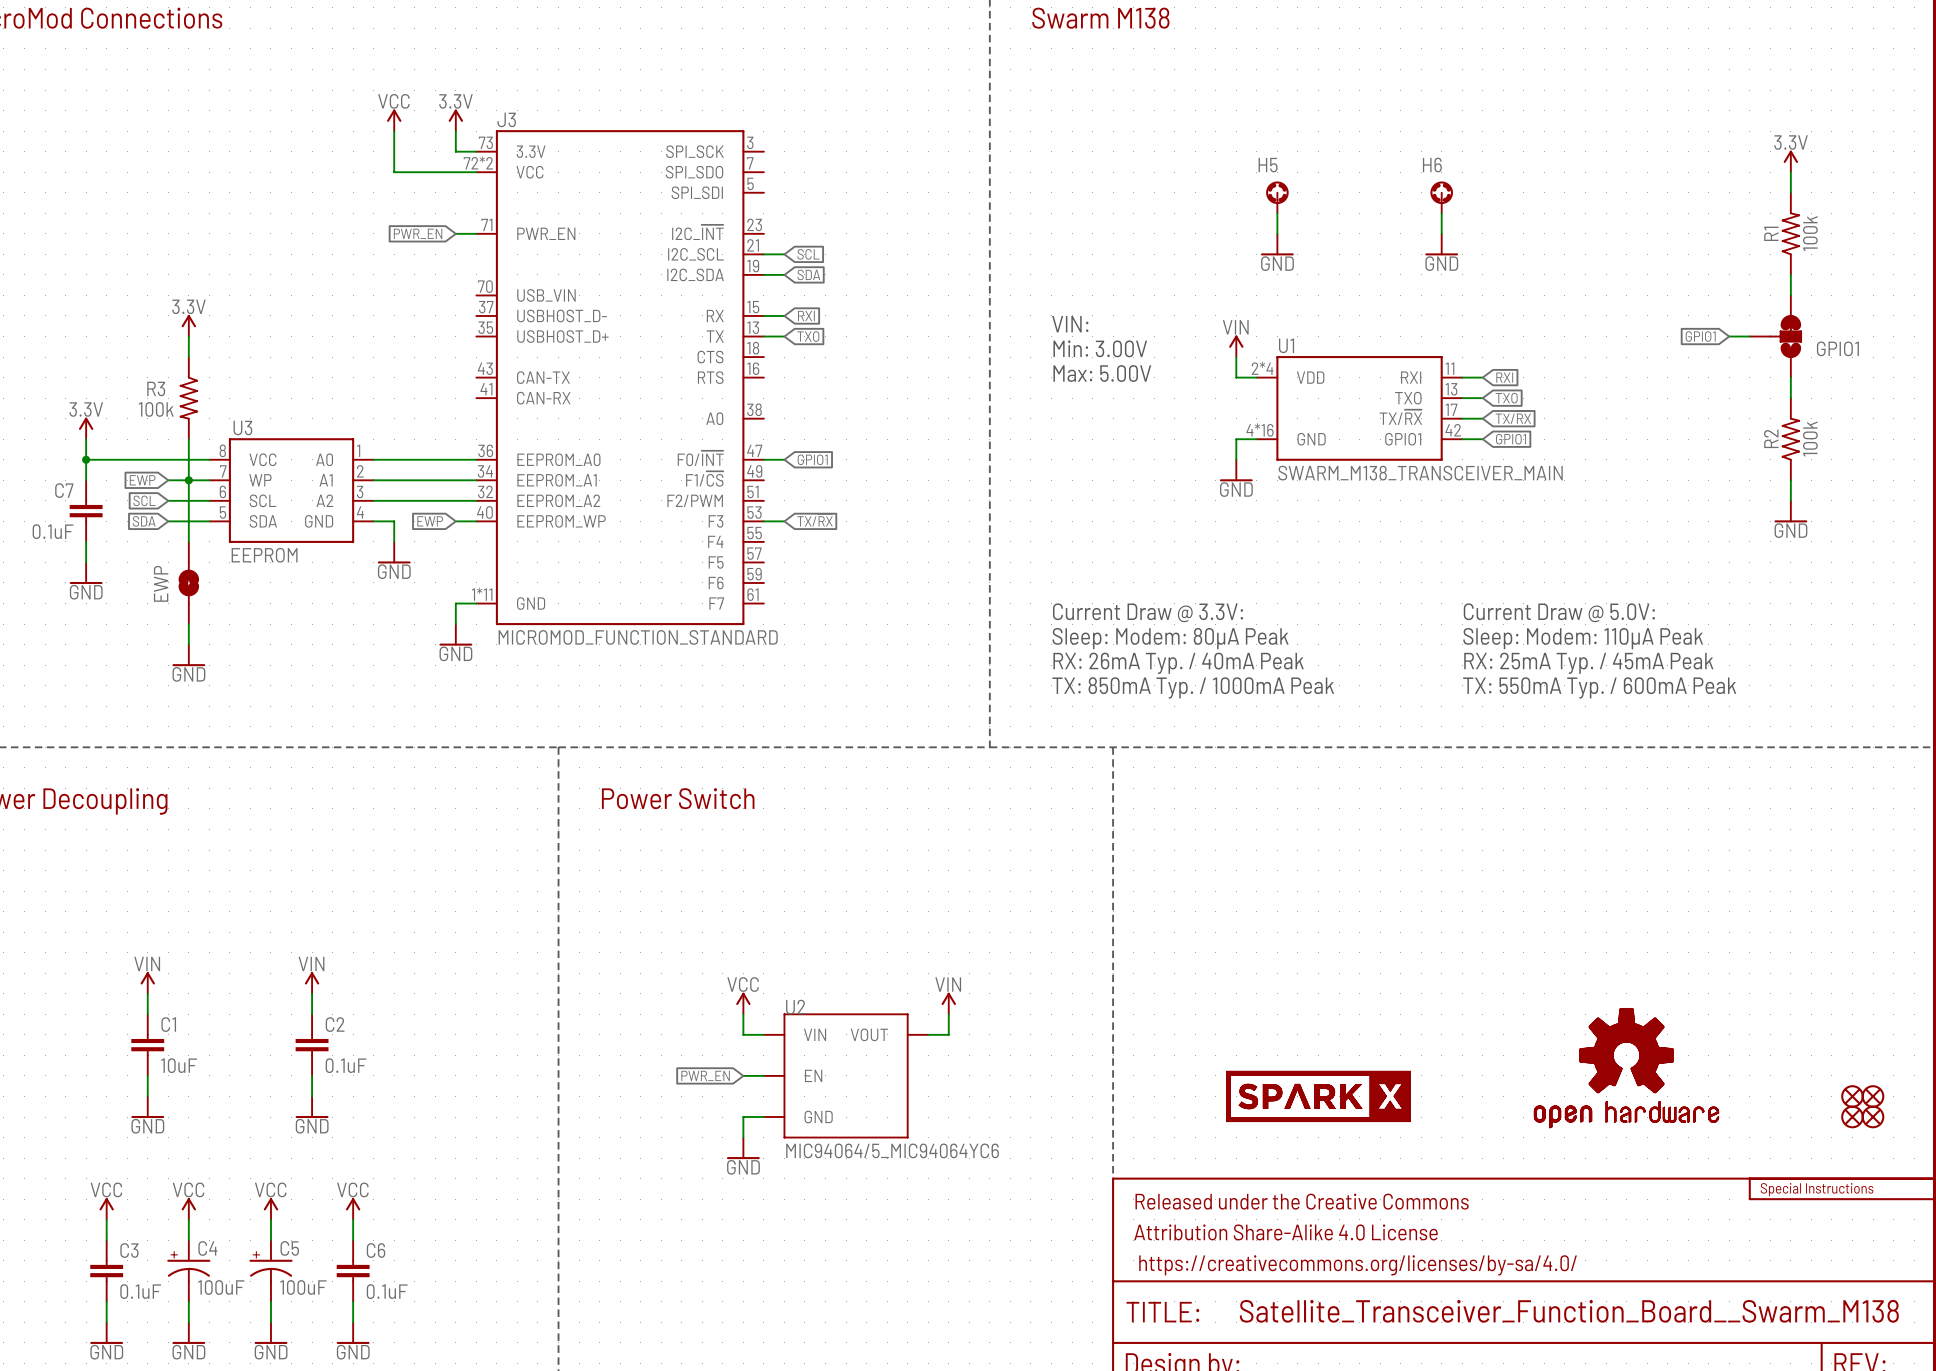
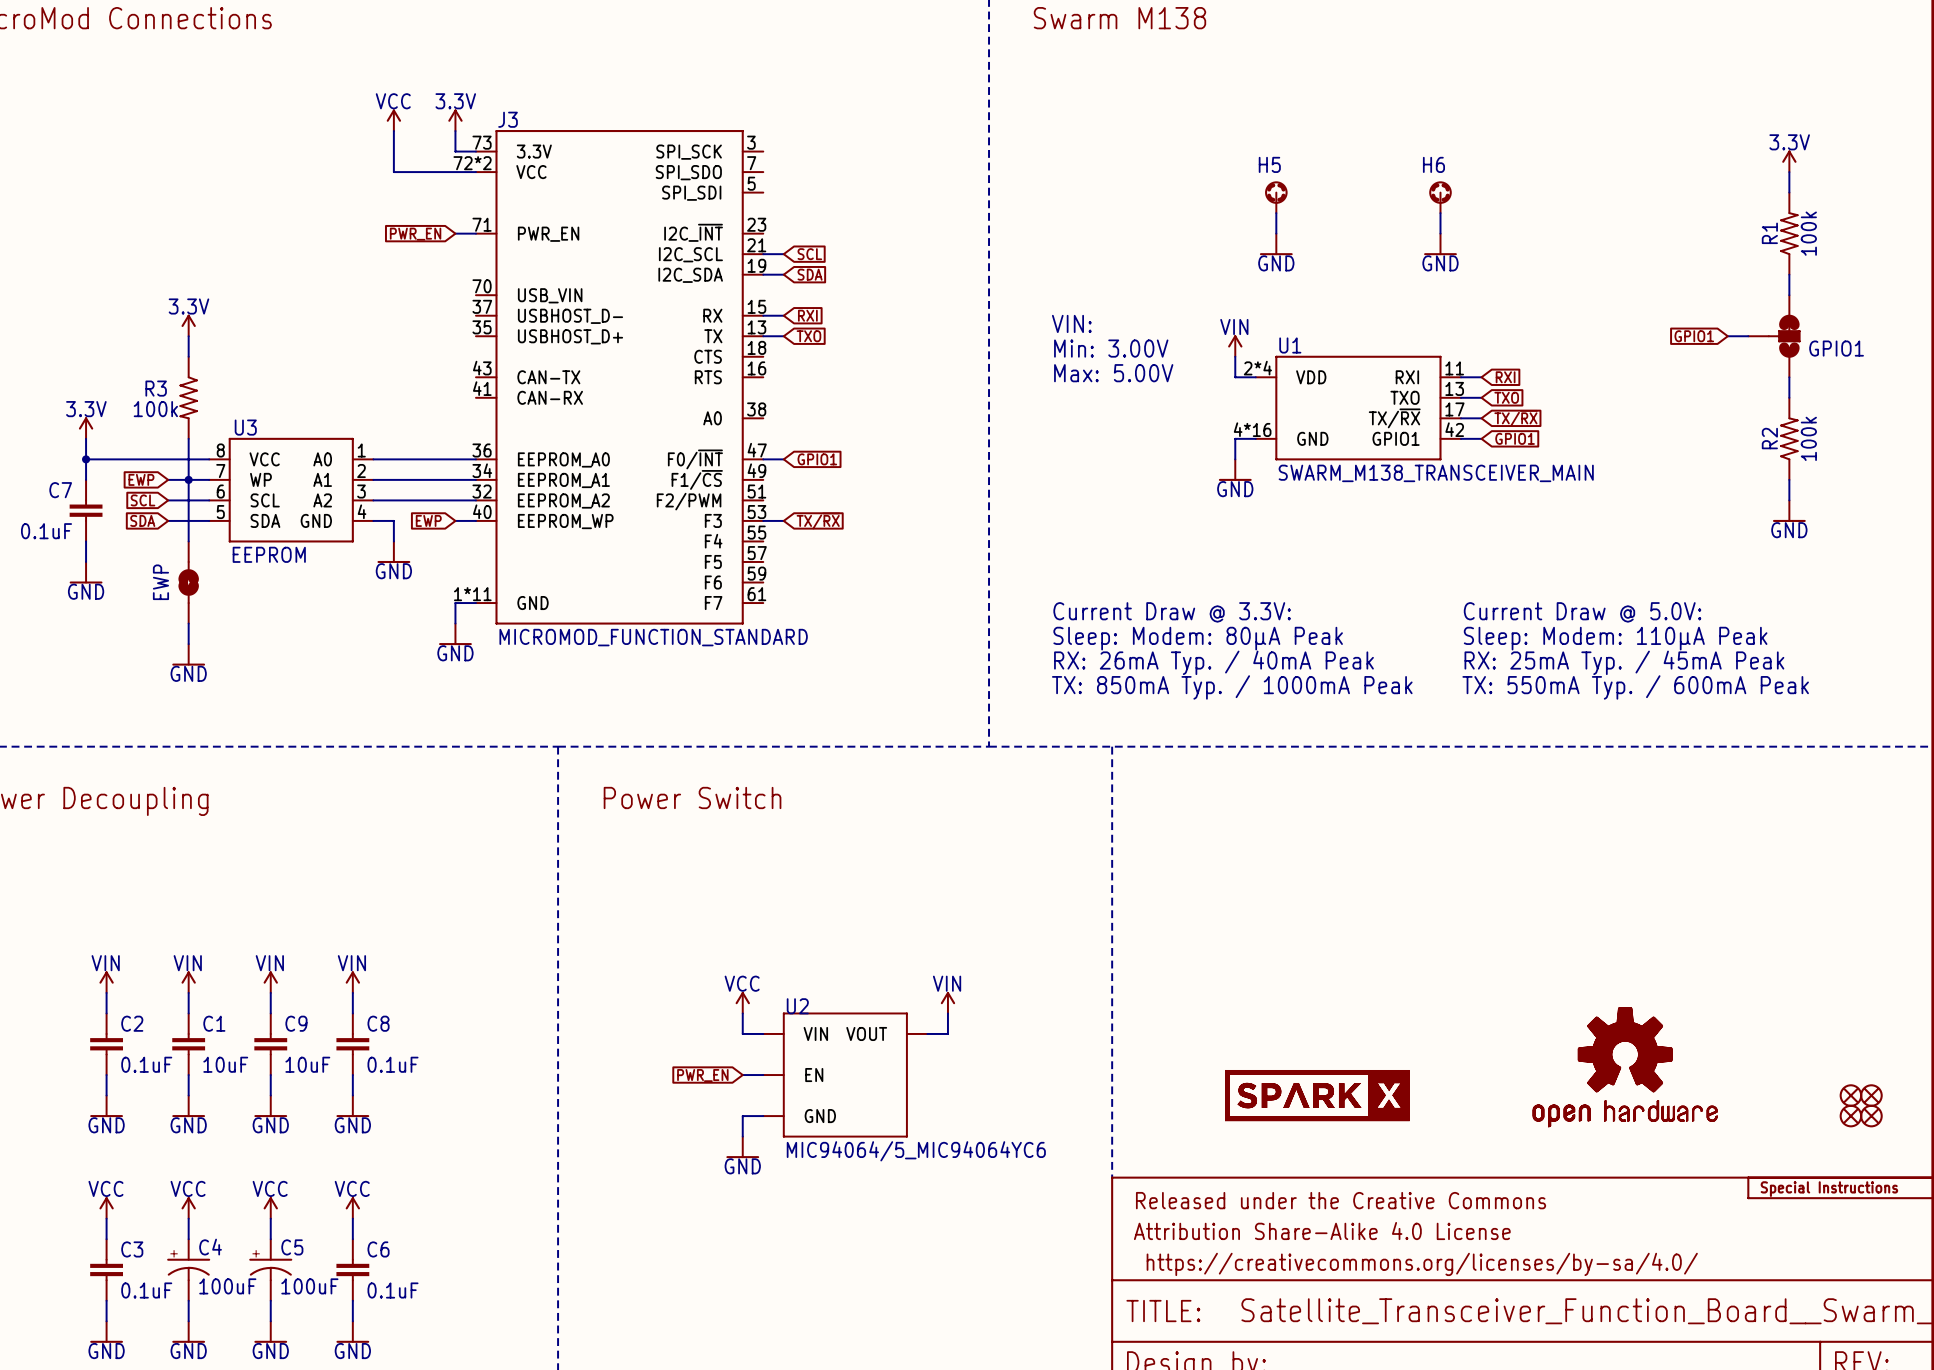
power symbol: none -> VIN (106, 982)
power symbol: VIN (147, 982) -> none
power symbol: none -> VIN (188, 982)
power symbol: none -> VIN (270, 982)
power symbol: VIN (312, 982) -> none
power symbol: none -> VIN (352, 982)
wire: (147, 993) (147, 1014) -> (106, 992) (106, 1013)
wire: none -> (188, 992) (188, 1013)
wire: (312, 993) (312, 1014) -> (270, 992) (270, 1013)
wire: none -> (352, 992) (352, 1013)
C1 position: (147, 1045) -> (188, 1044)
C9: none -> 10uF (270, 1044)
C2 position: (312, 1045) -> (106, 1044)
C8: none -> 0.1uF (352, 1044)
wire: (147, 1075) (147, 1096) -> (106, 1075) (106, 1095)
wire: none -> (188, 1075) (188, 1095)
wire: (312, 1075) (312, 1096) -> (270, 1075) (270, 1095)
wire: none -> (352, 1075) (352, 1095)
power symbol: none -> GND (106, 1106)
power symbol: GND (147, 1107) -> none
power symbol: none -> GND (188, 1106)
power symbol: none -> GND (270, 1106)
power symbol: GND (312, 1107) -> none
power symbol: none -> GND (352, 1106)

